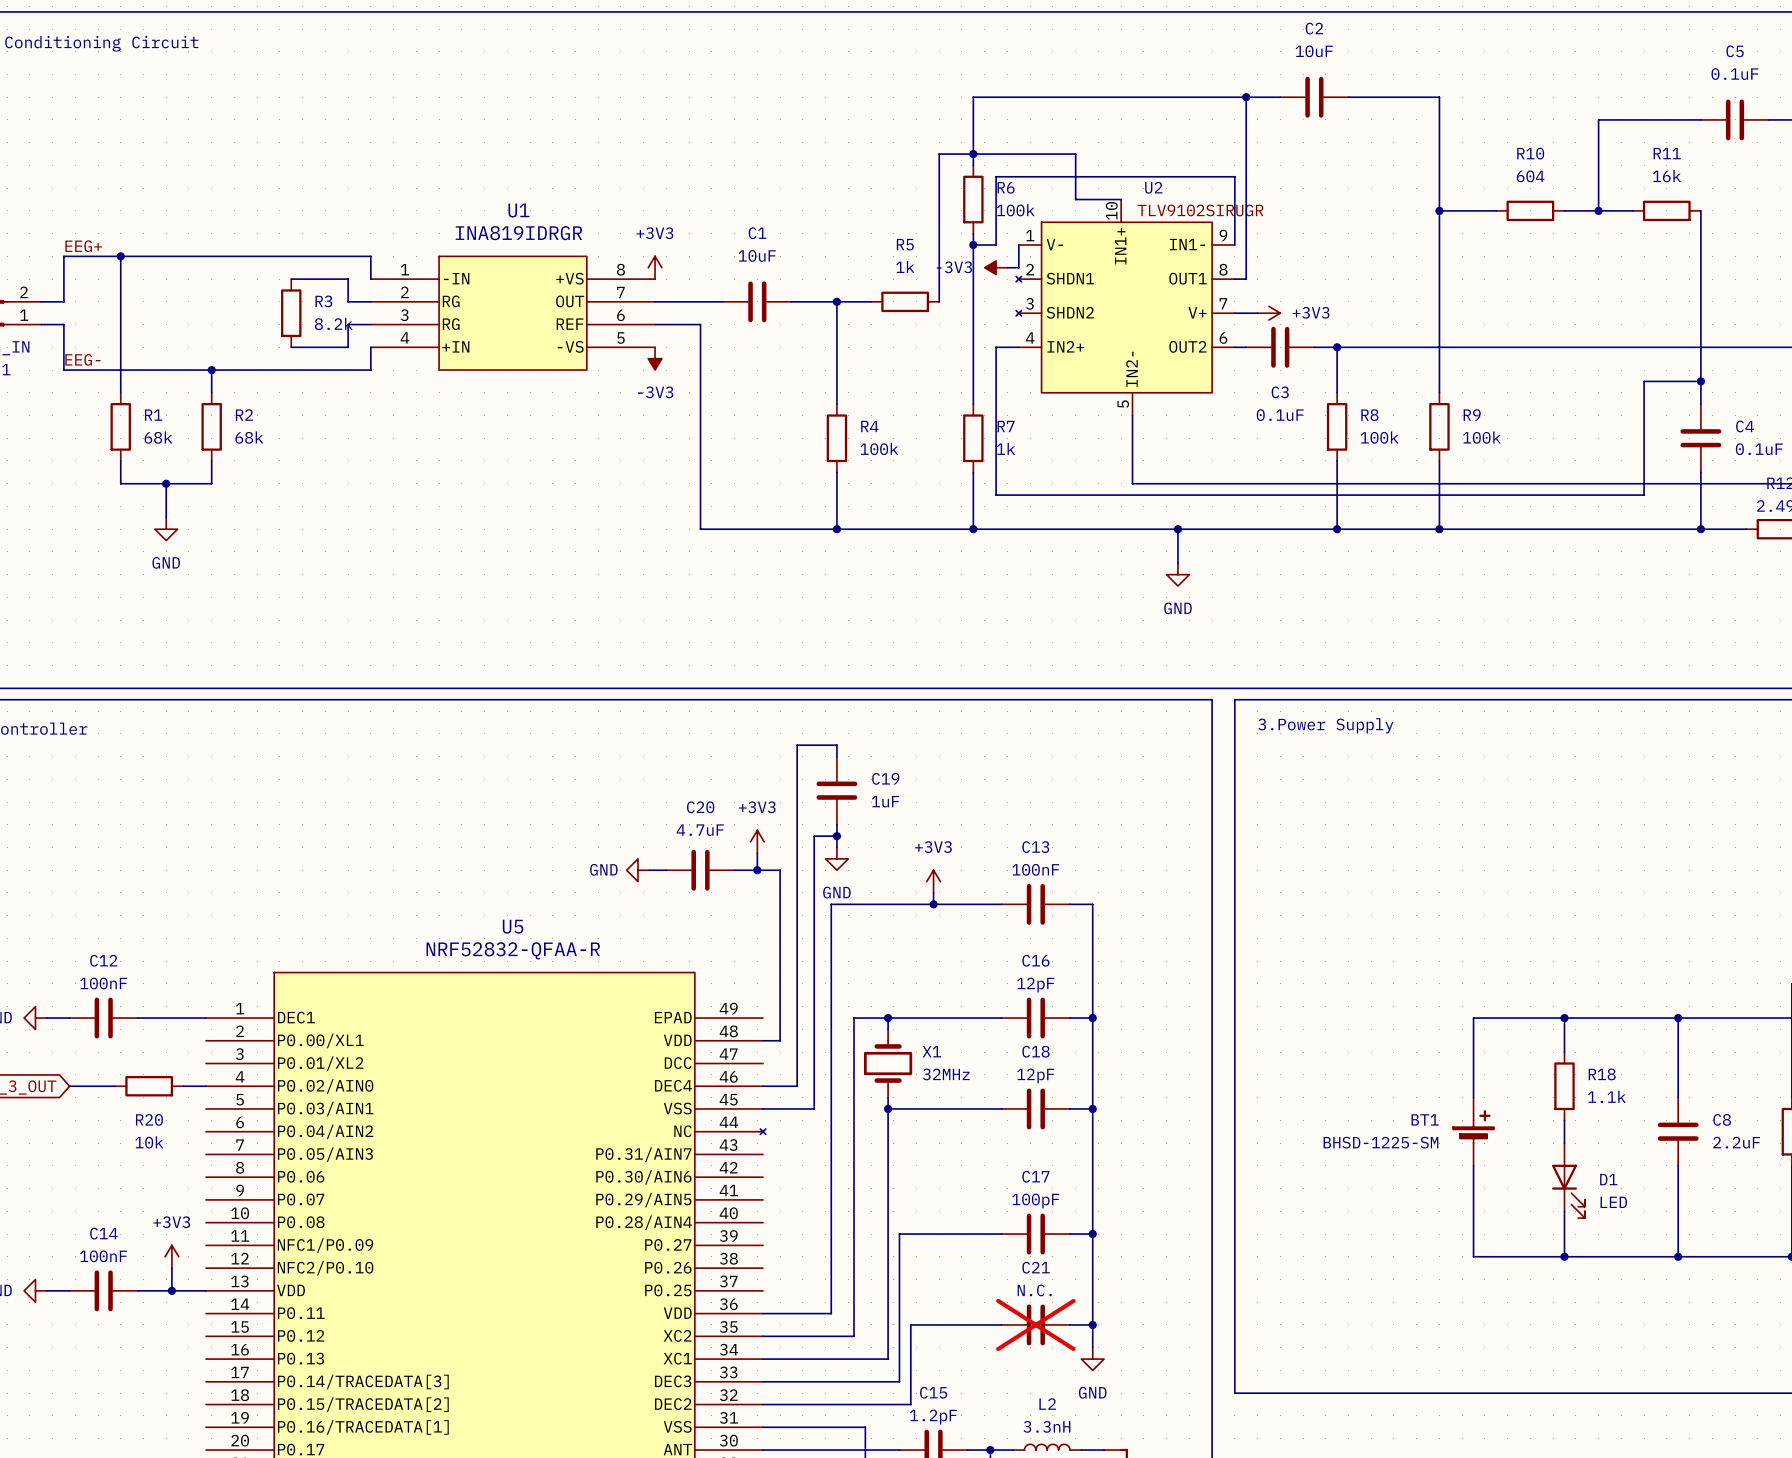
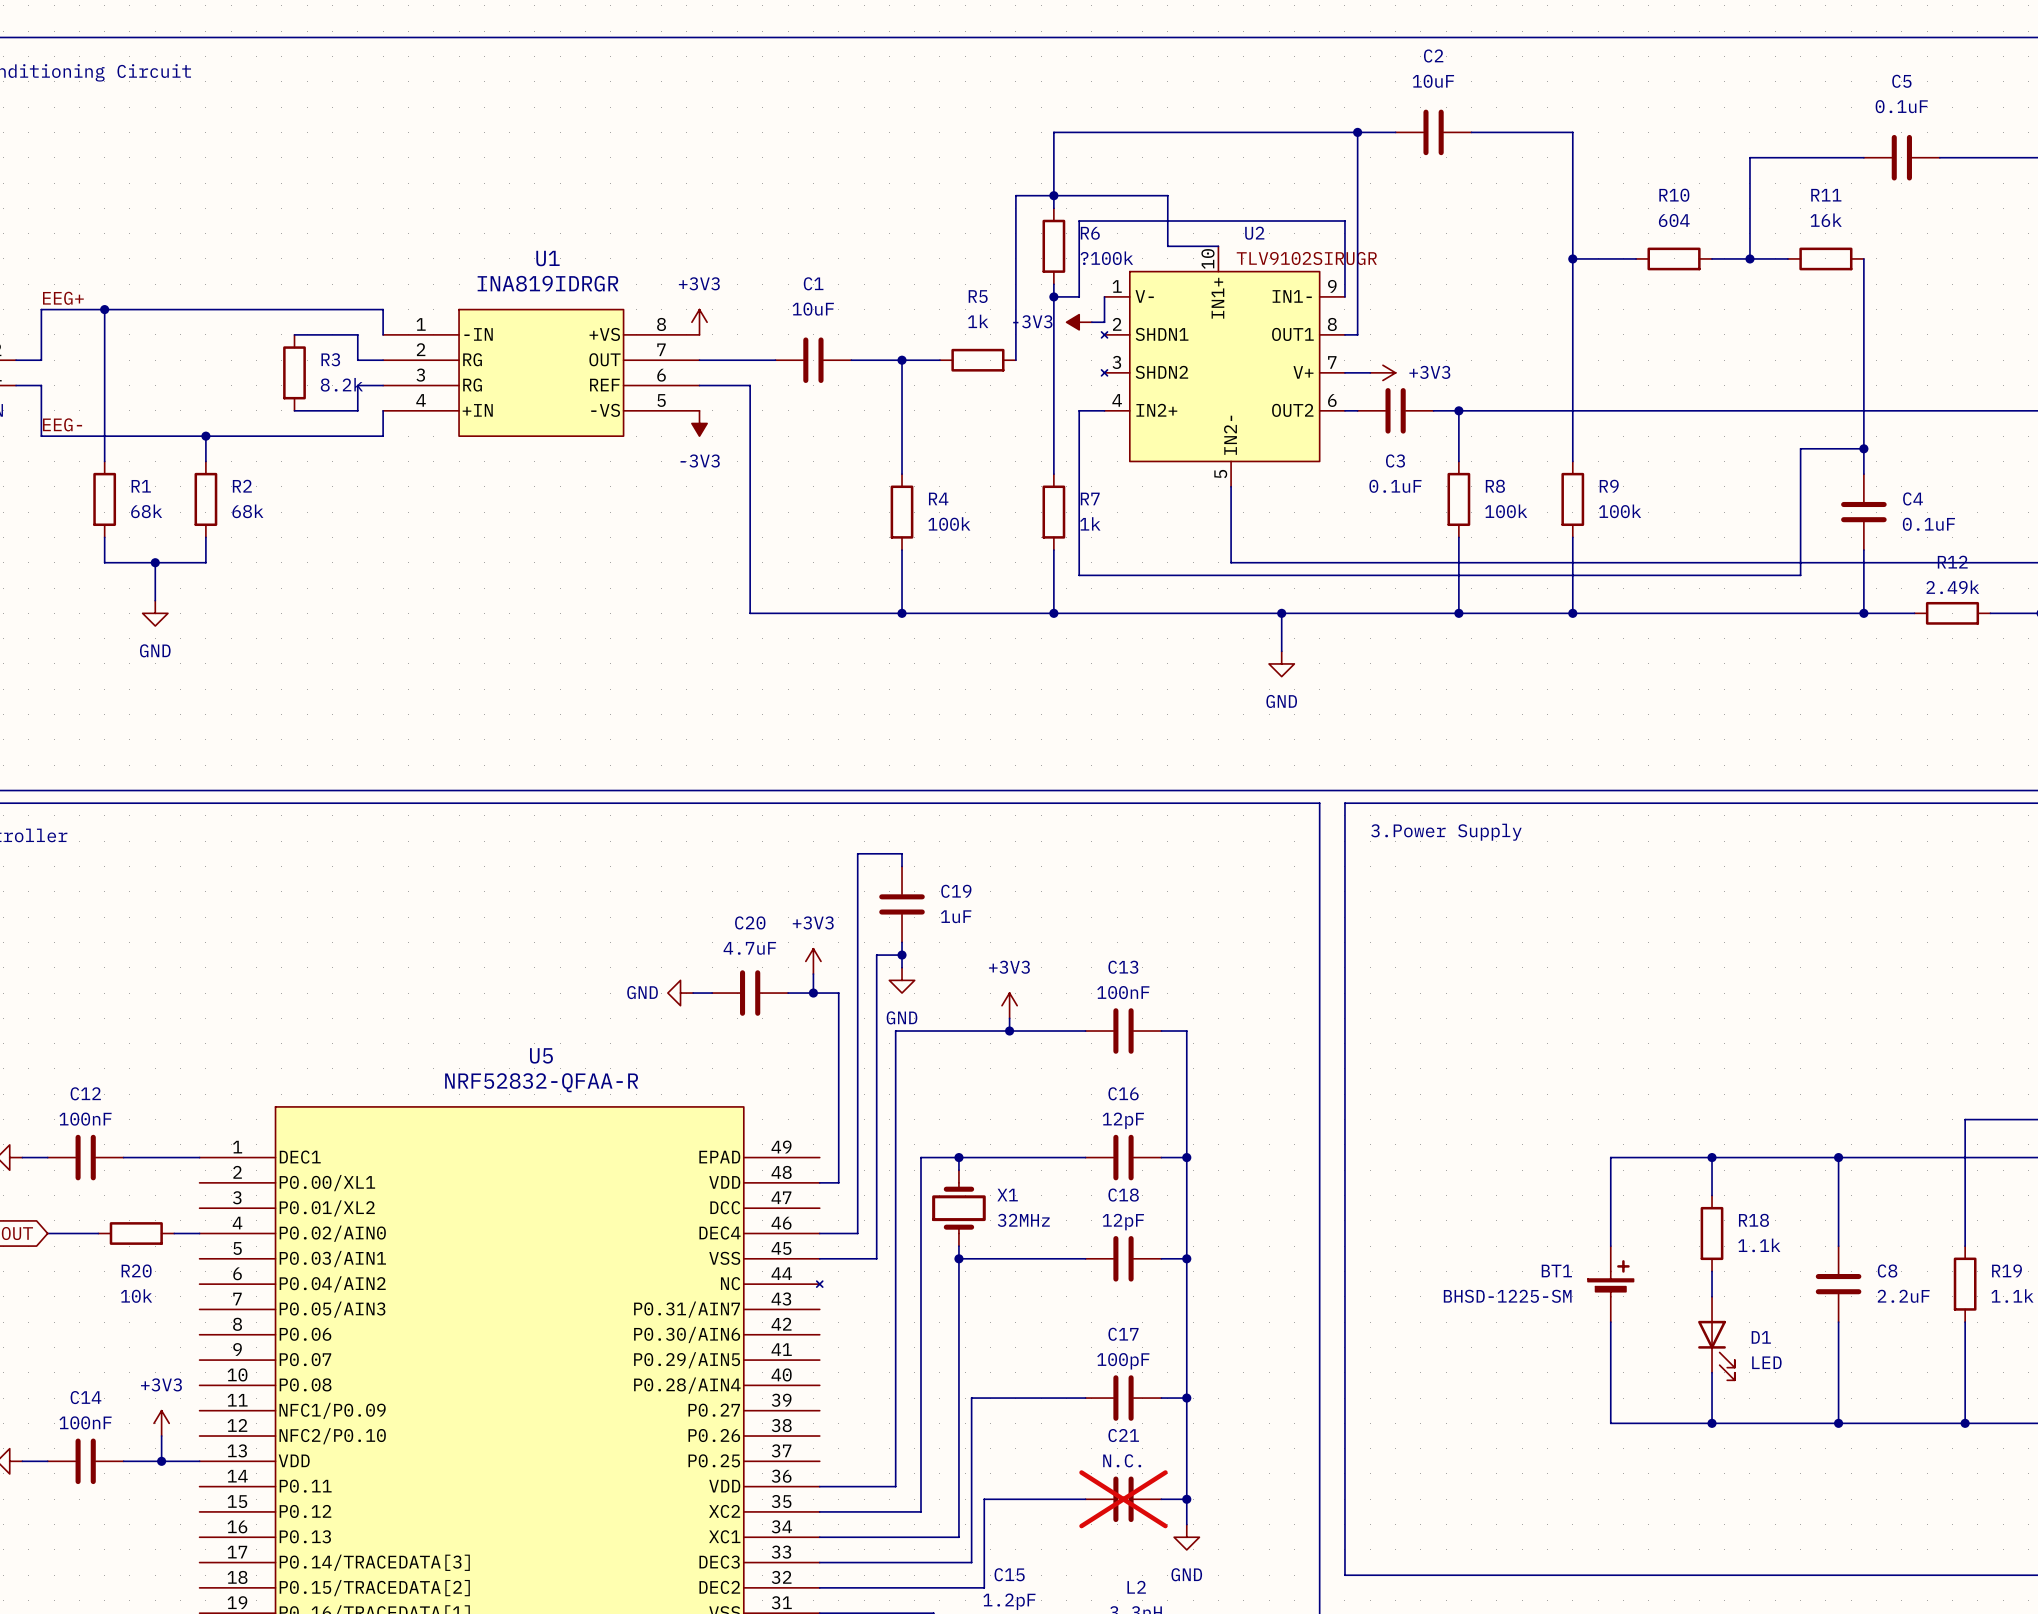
R6 value: 100k (1015, 210) -> ?100k (1106, 258)

